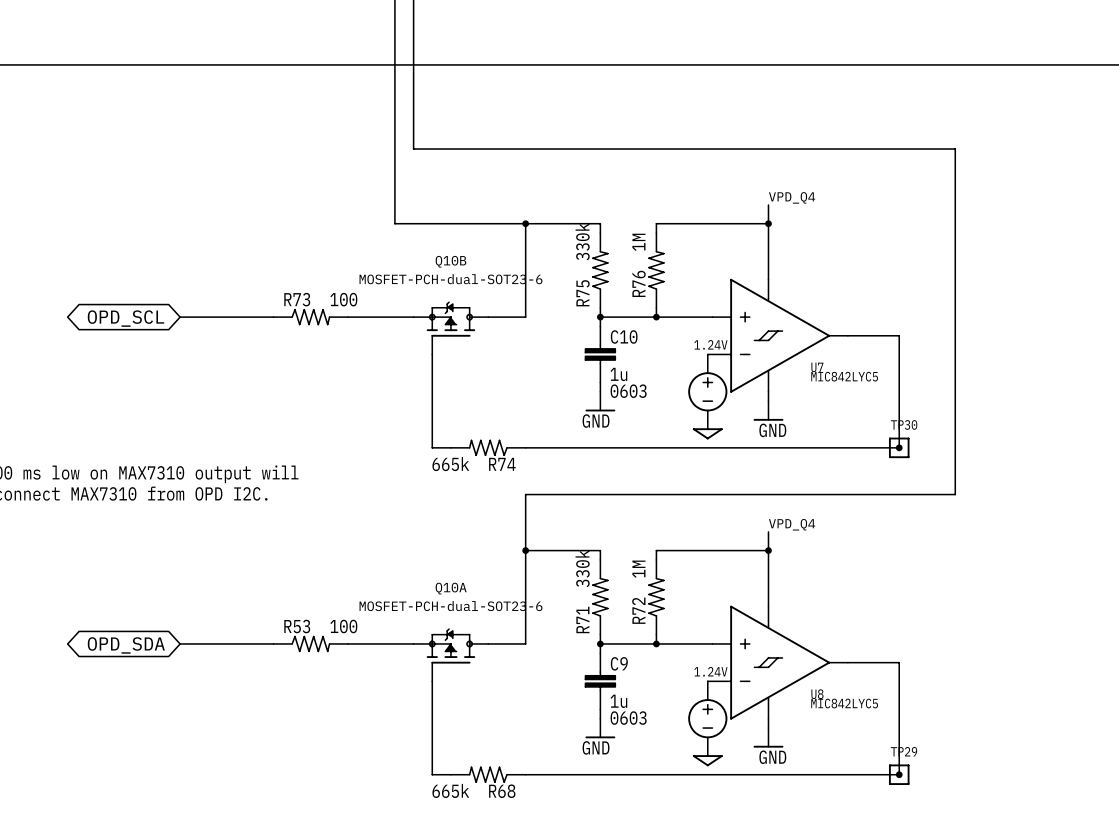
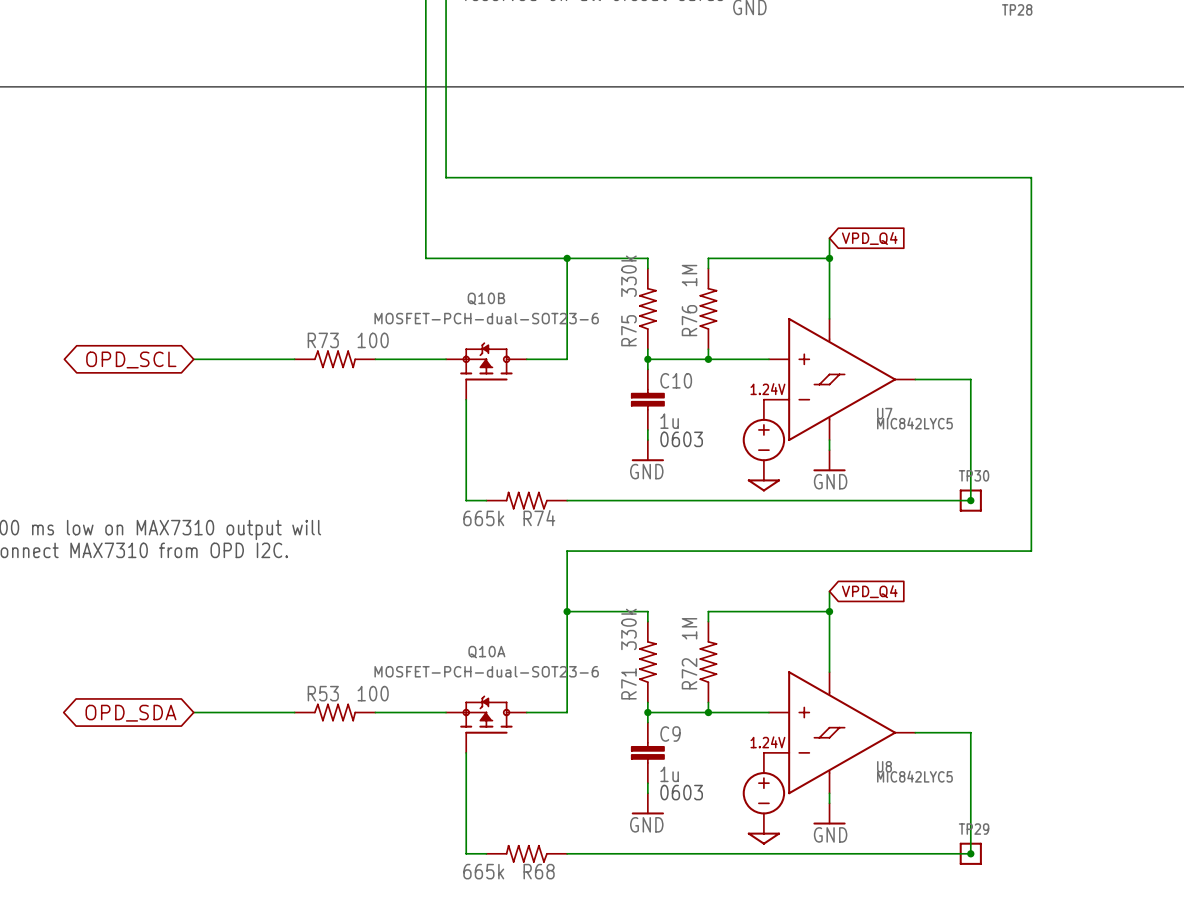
label: VPD_Q4 (792, 197) -> none
global label: none -> VPD_Q4 (869, 238)
label: VPD_Q4 (792, 524) -> none
global label: none -> VPD_Q4 (869, 591)

